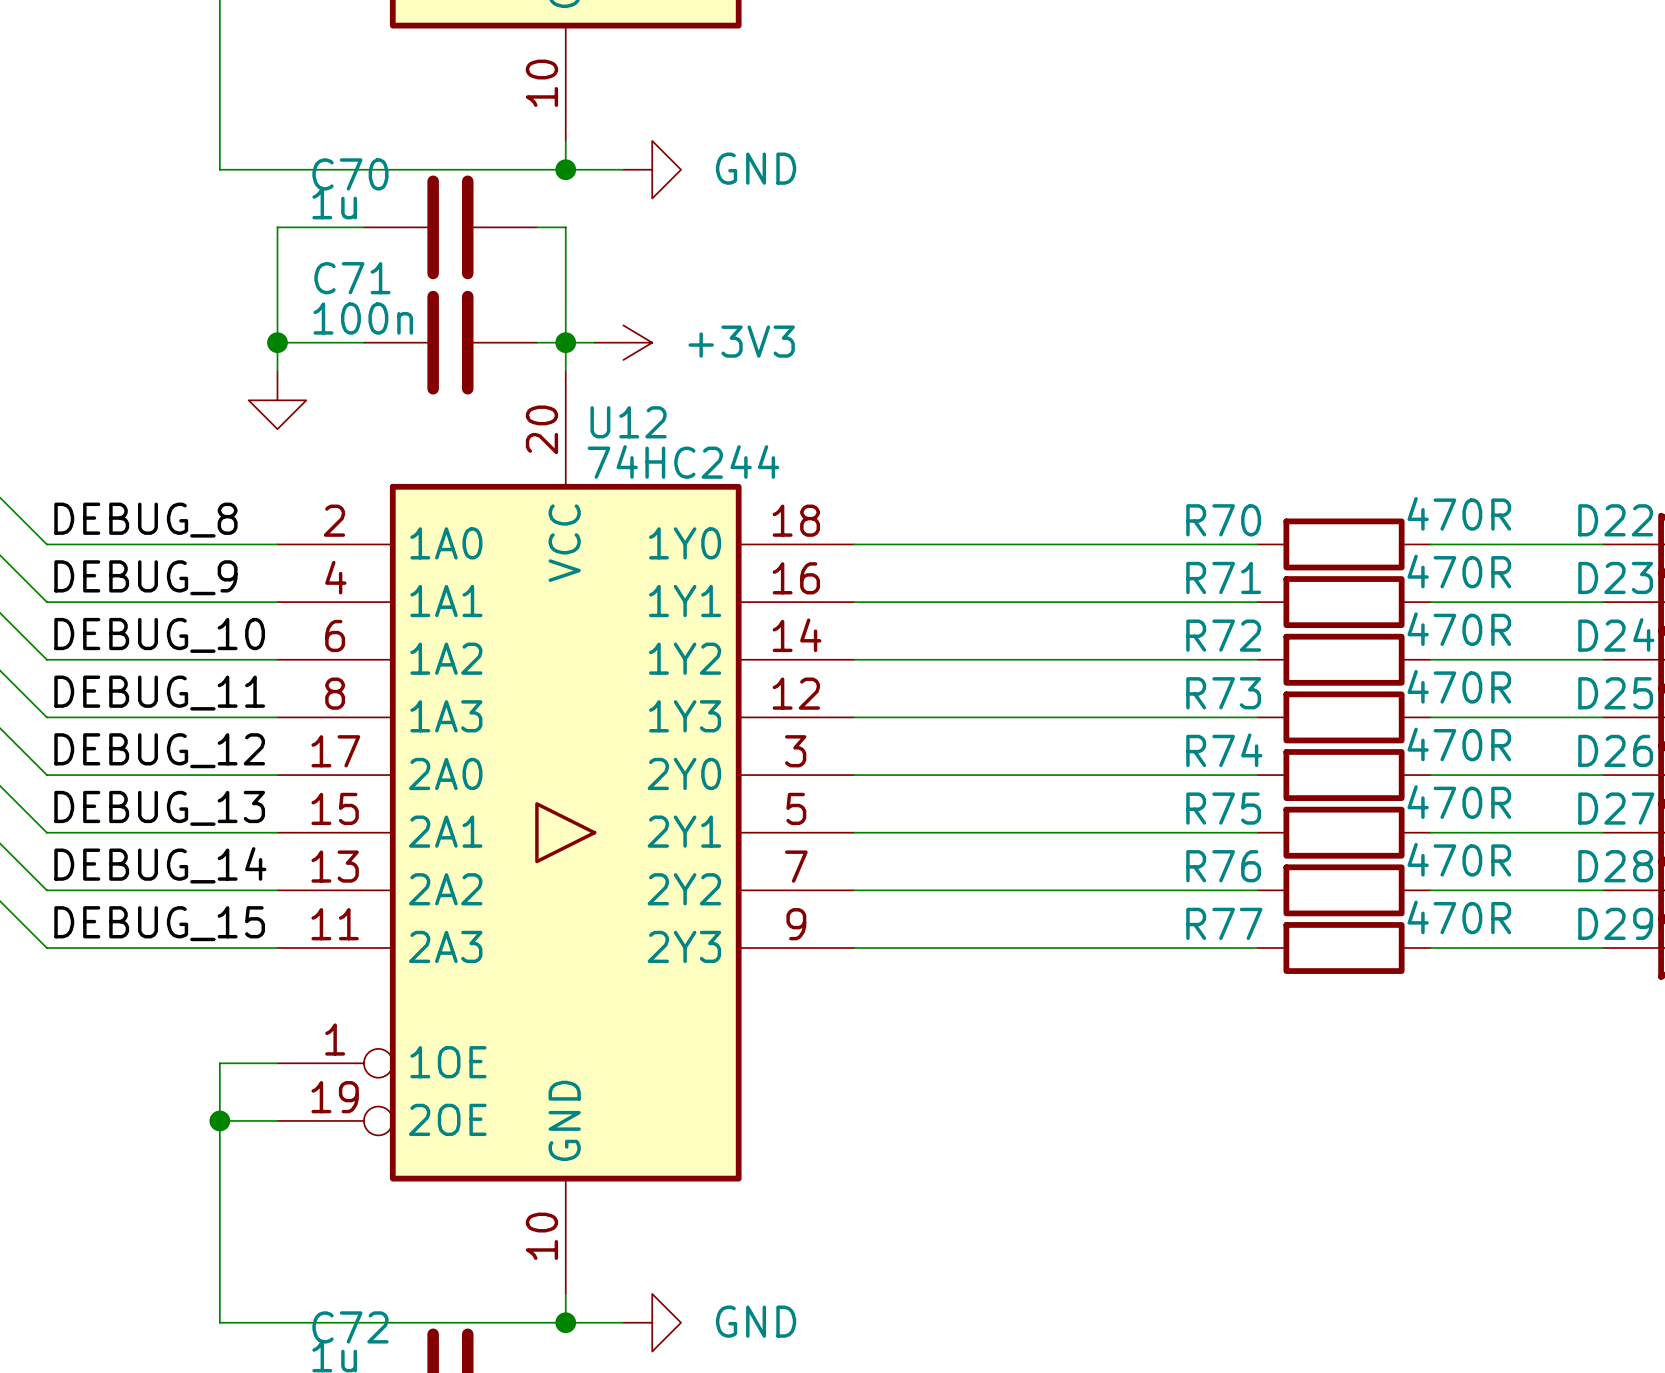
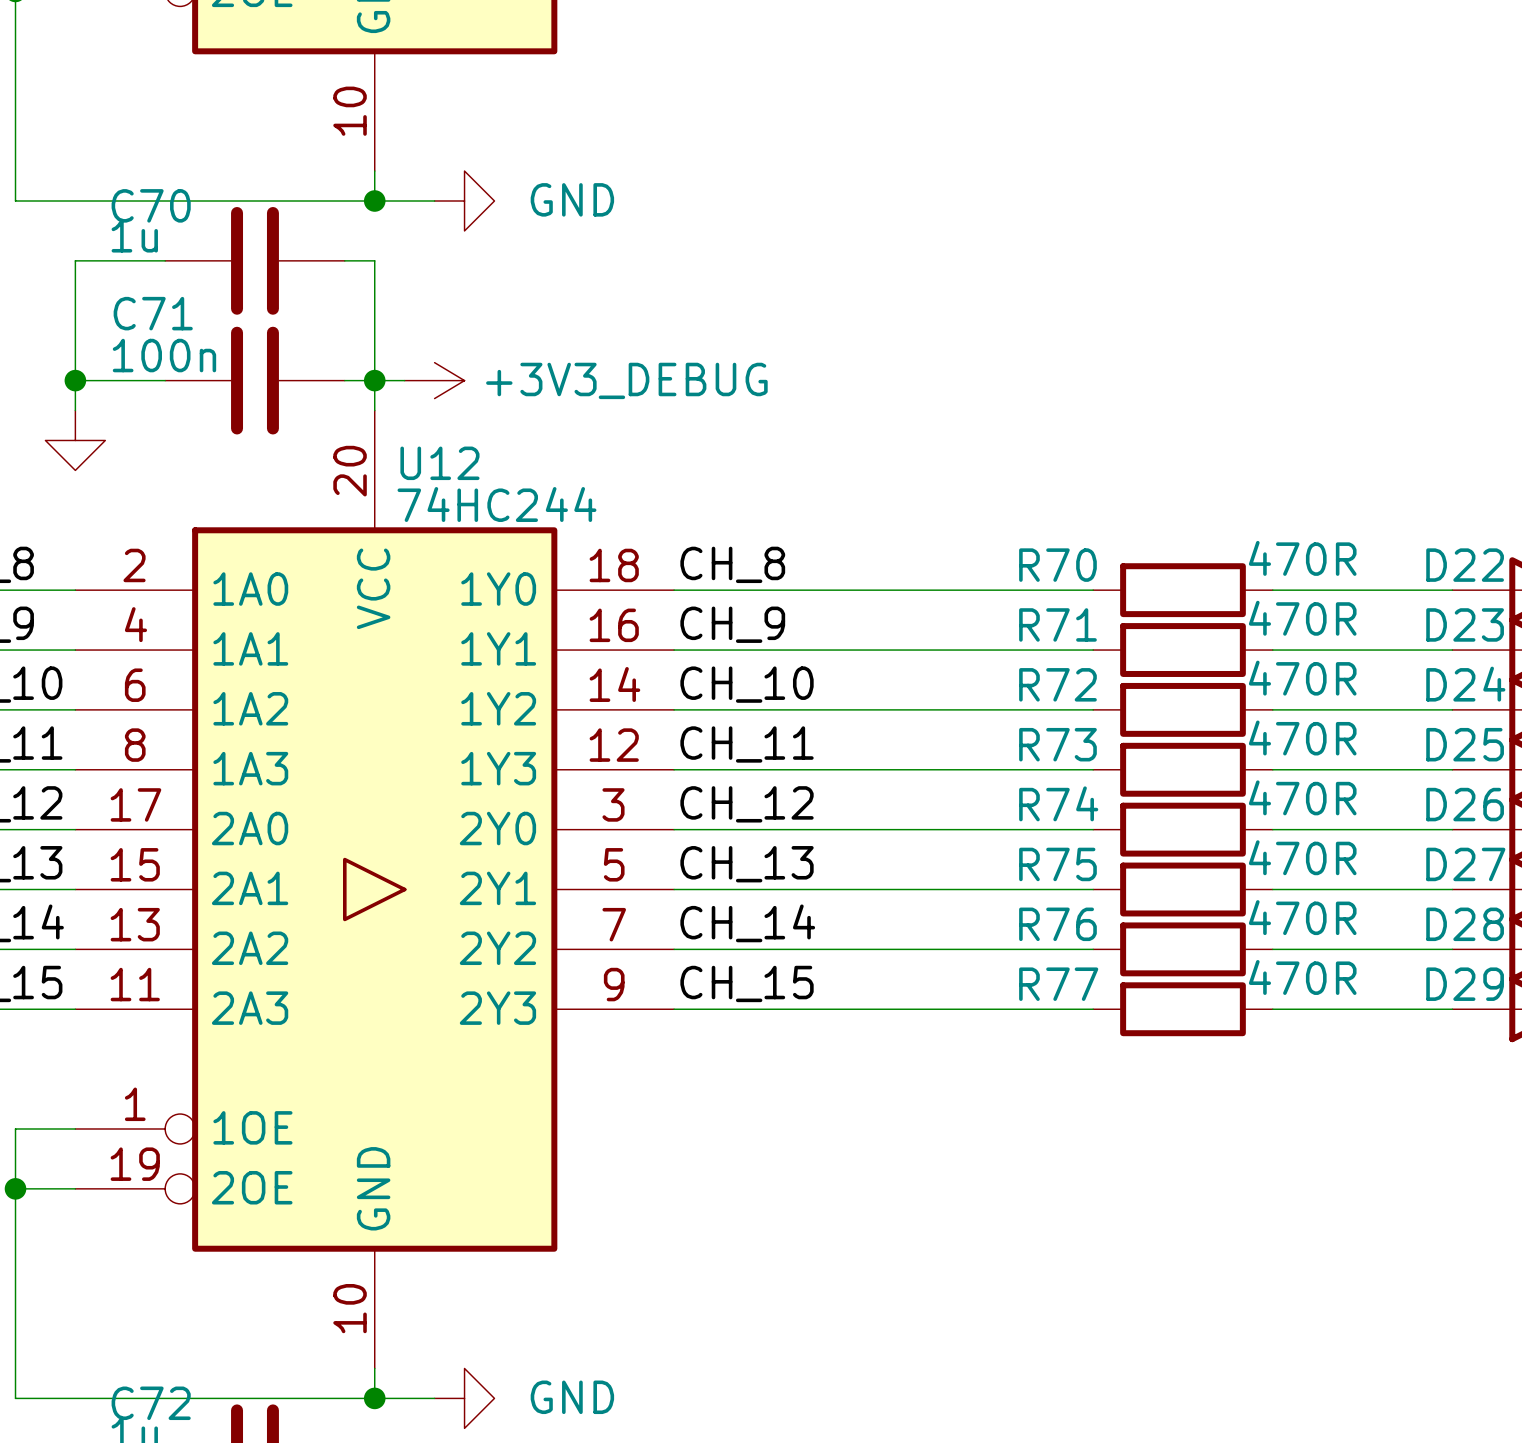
power symbol: +3V3 (623, 342) -> +3V3_DEBUG (434, 380)
label: none -> CH_8 (732, 564)
label: none -> CH_9 (732, 624)
label: none -> CH_10 (747, 684)
label: none -> CH_11 (747, 744)
label: none -> CH_12 (747, 804)
label: none -> CH_13 (747, 864)
label: none -> CH_14 (747, 923)
label: none -> CH_15 (747, 983)

